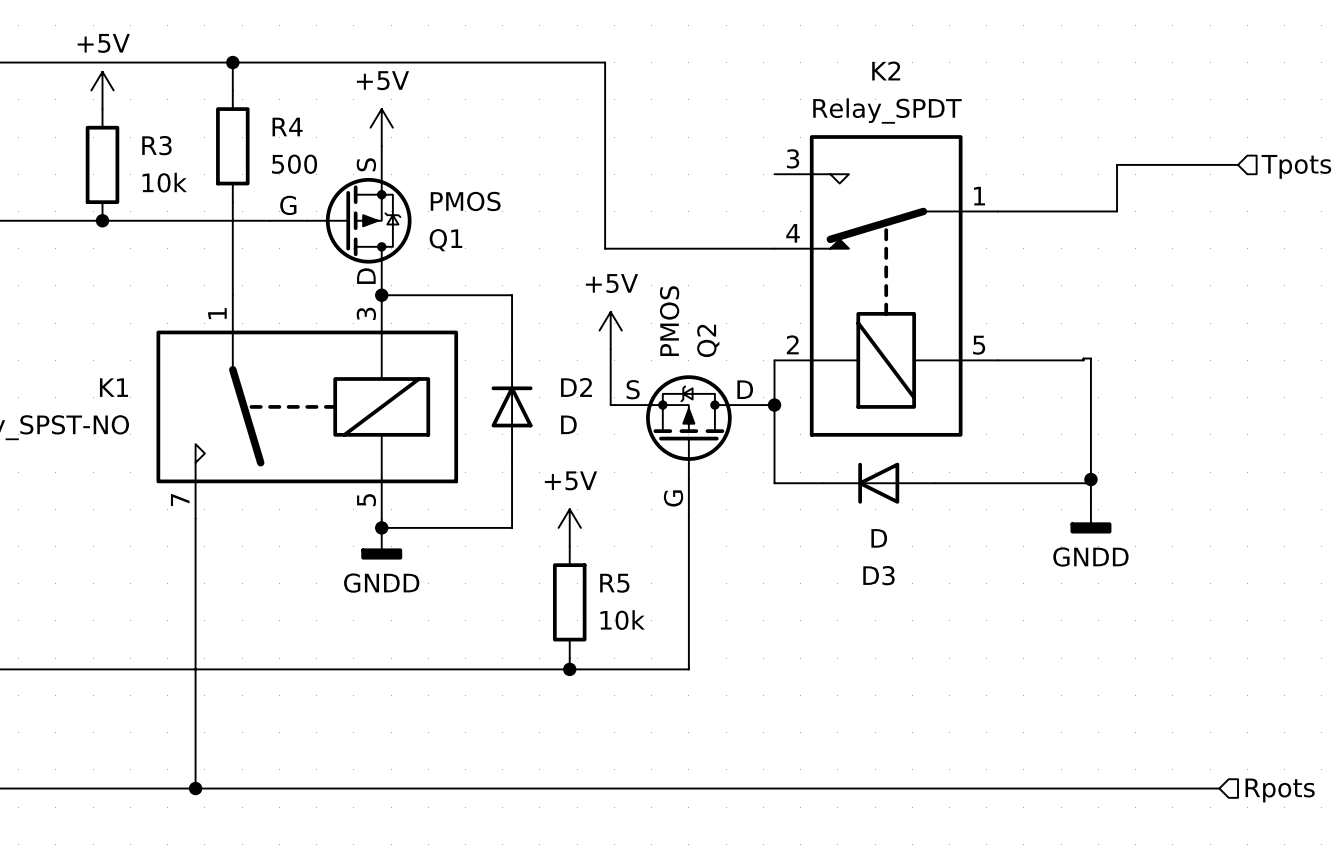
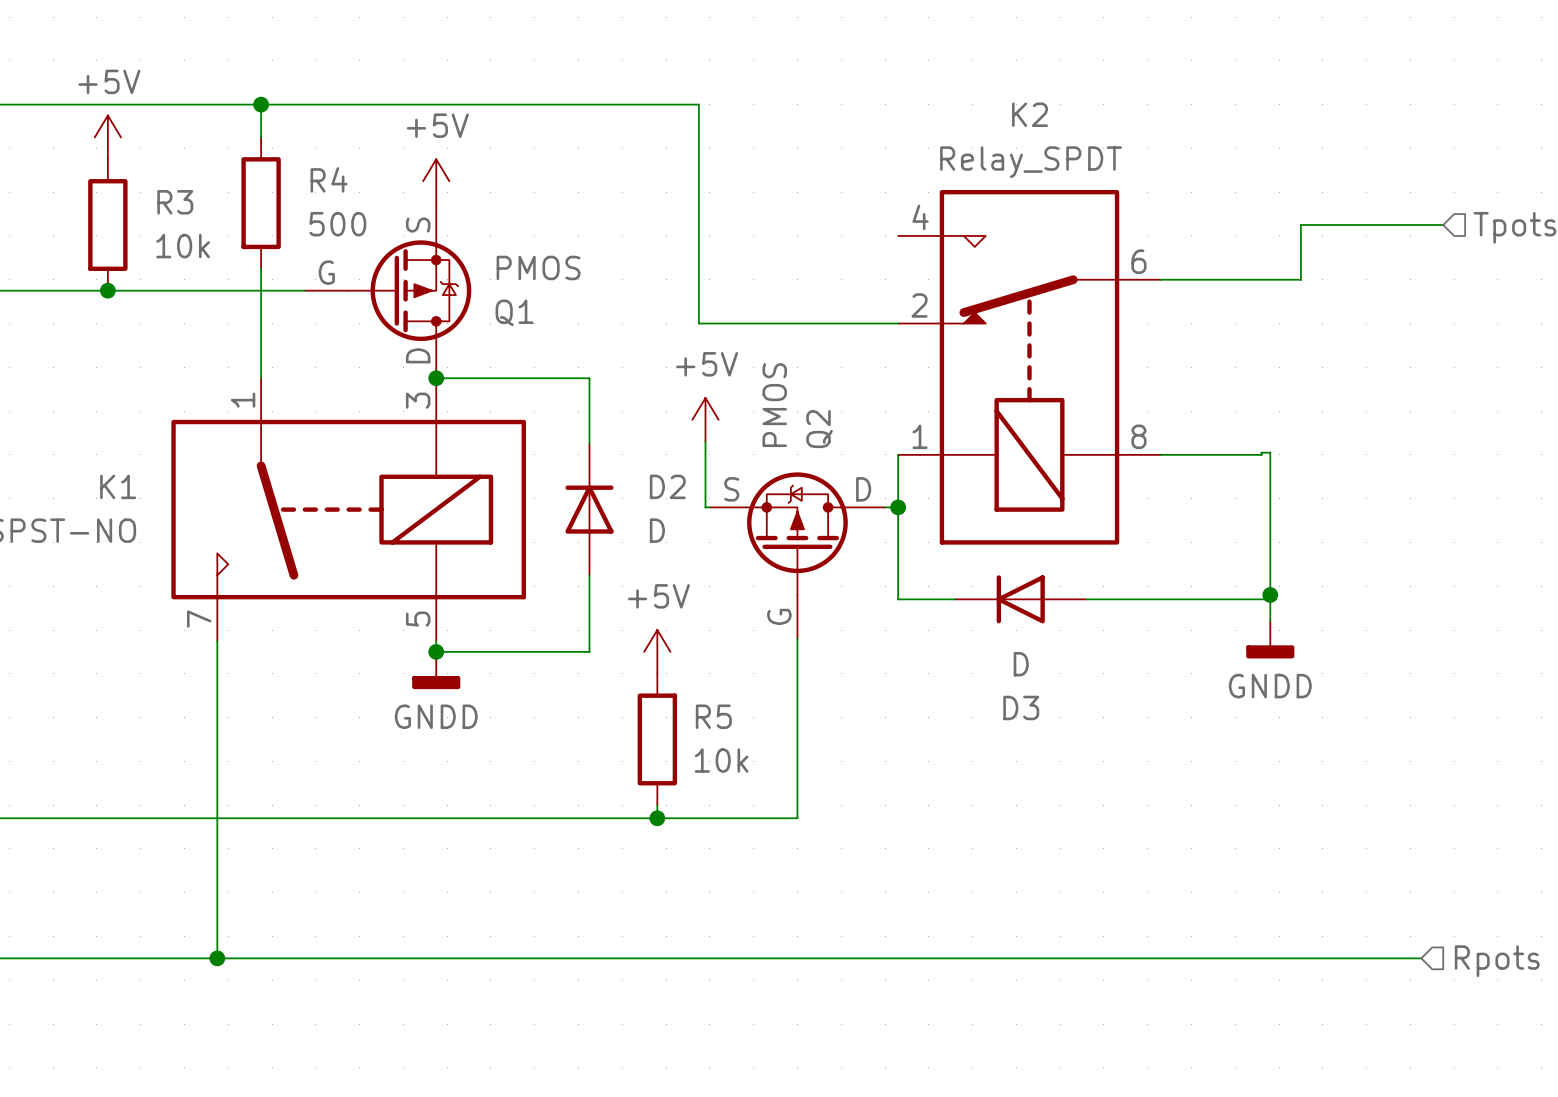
K2 pin number: 3 (793, 158) -> 4 (920, 217)
K2 pin number: 1 (979, 196) -> 6 (1138, 261)
K2 pin number: 4 (793, 233) -> 2 (919, 305)
K2 pin number: 2 (792, 344) -> 1 (920, 436)
K2 pin number: 5 (979, 345) -> 8 (1138, 436)

